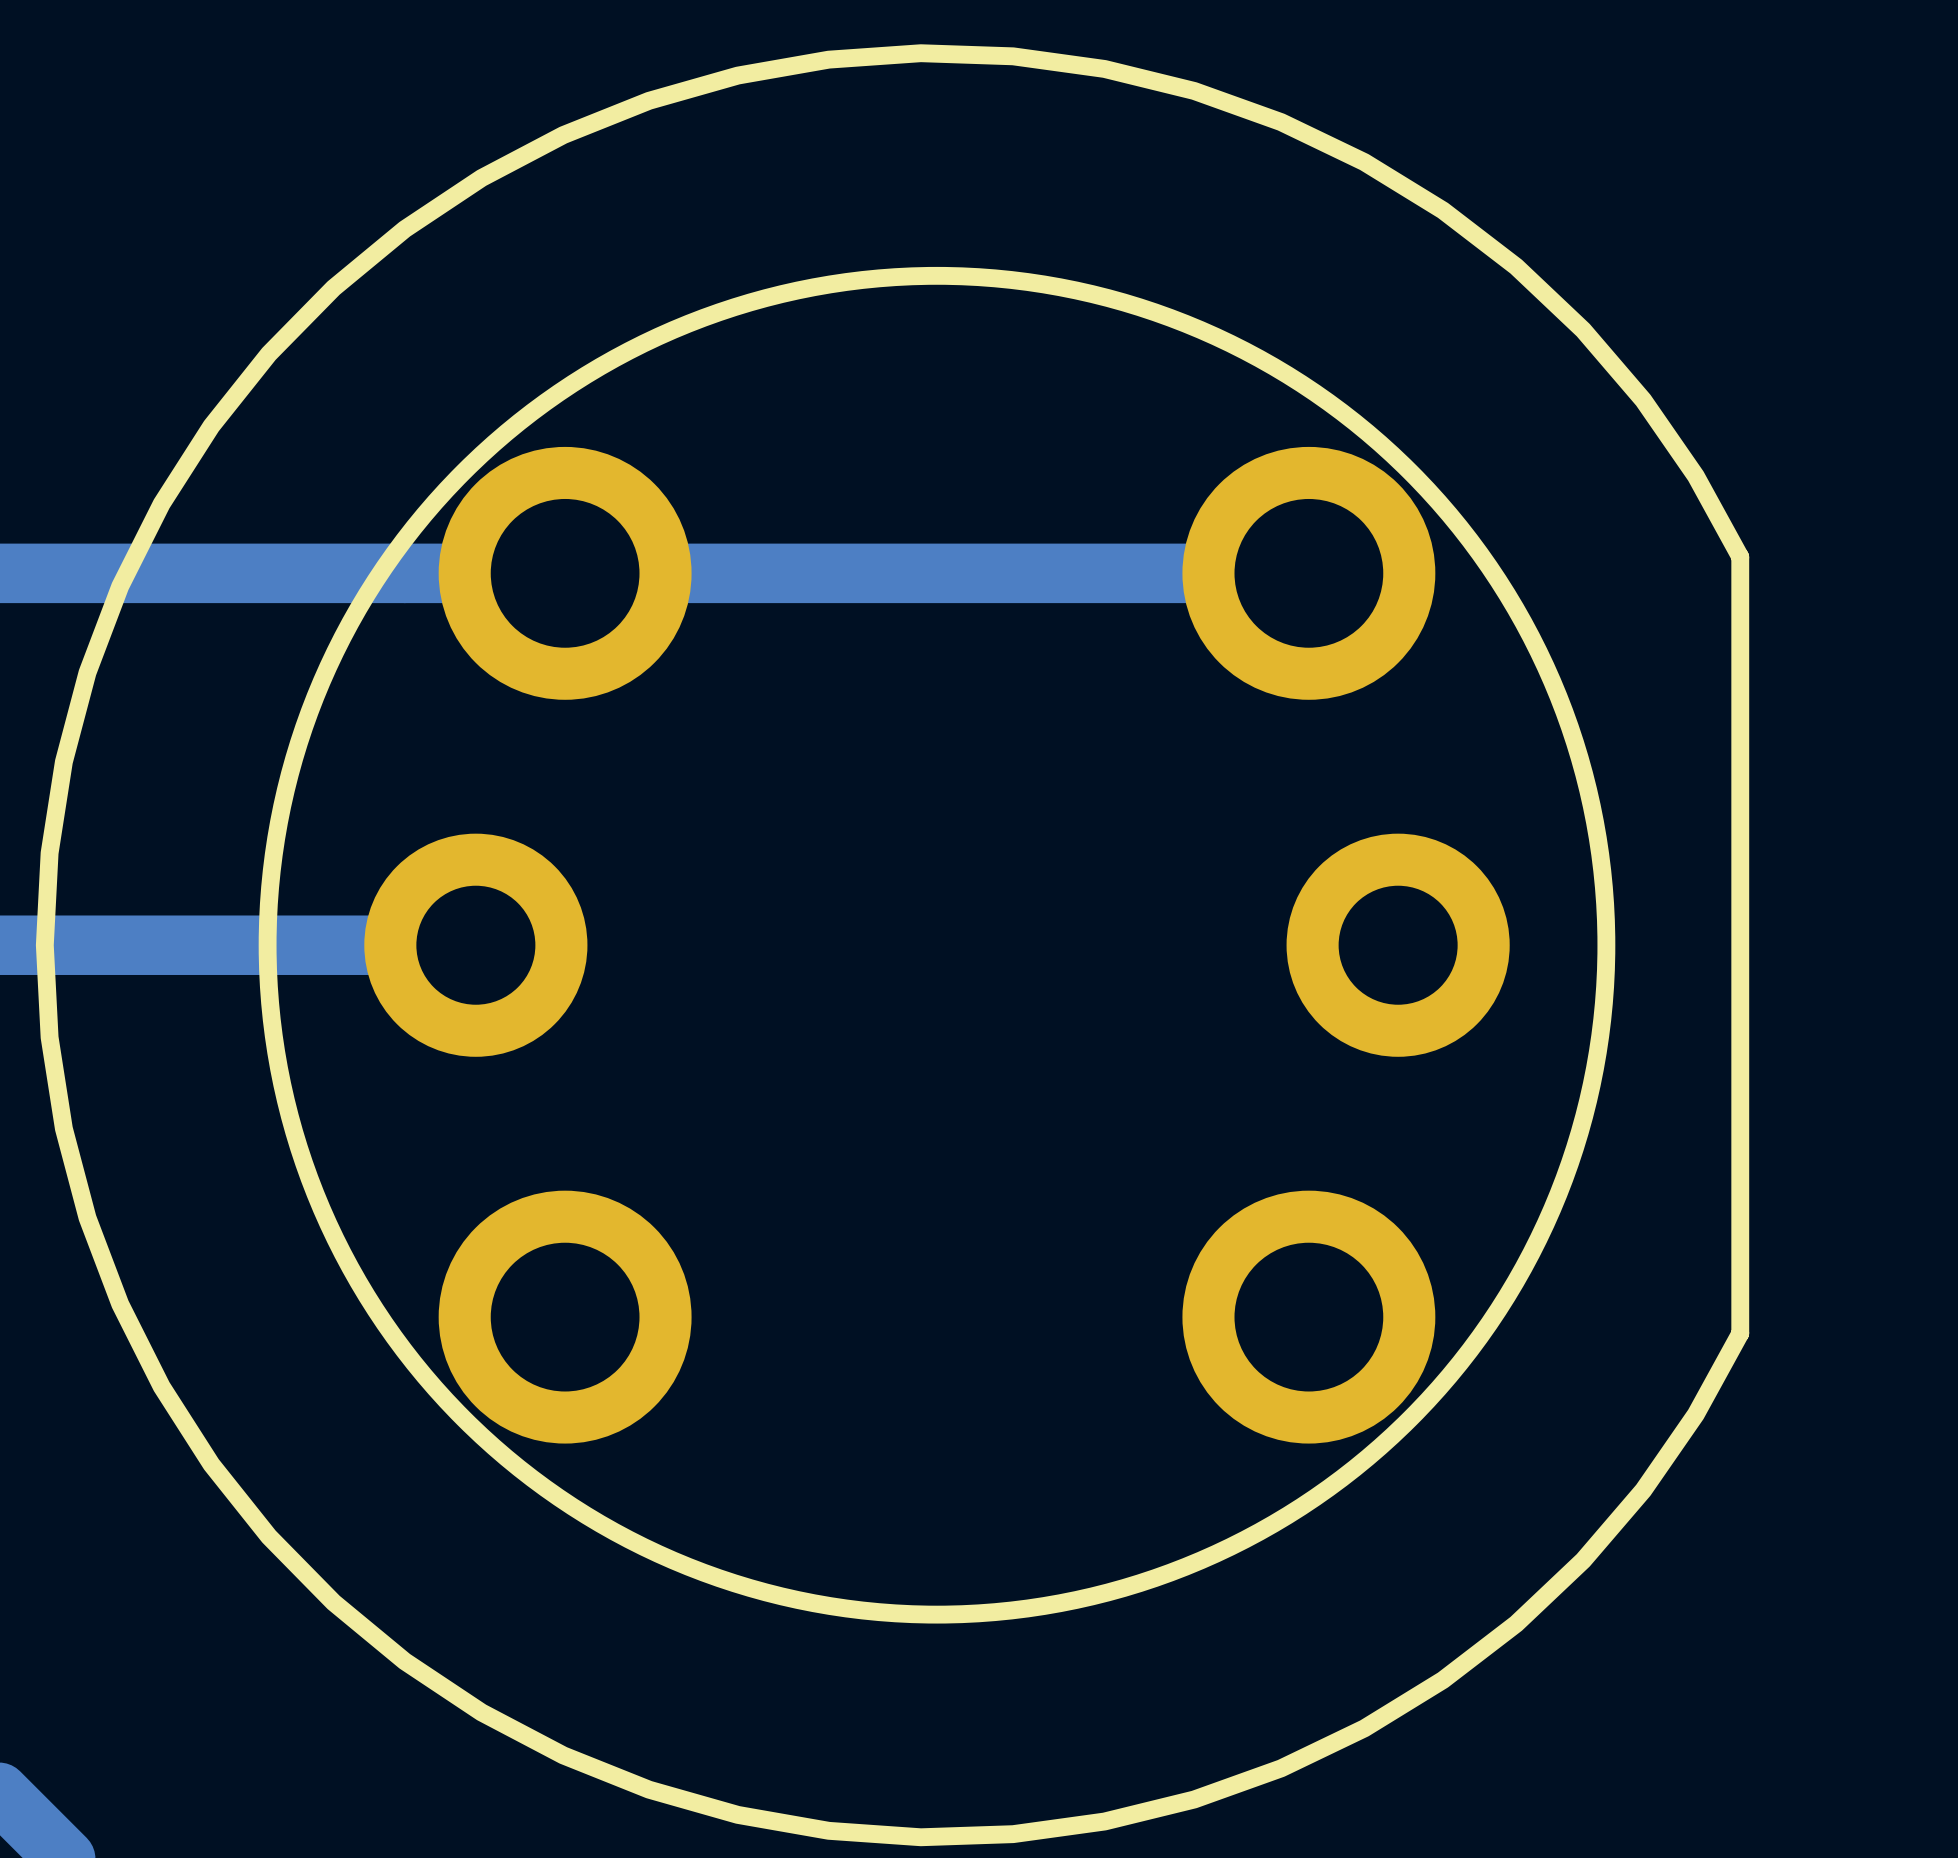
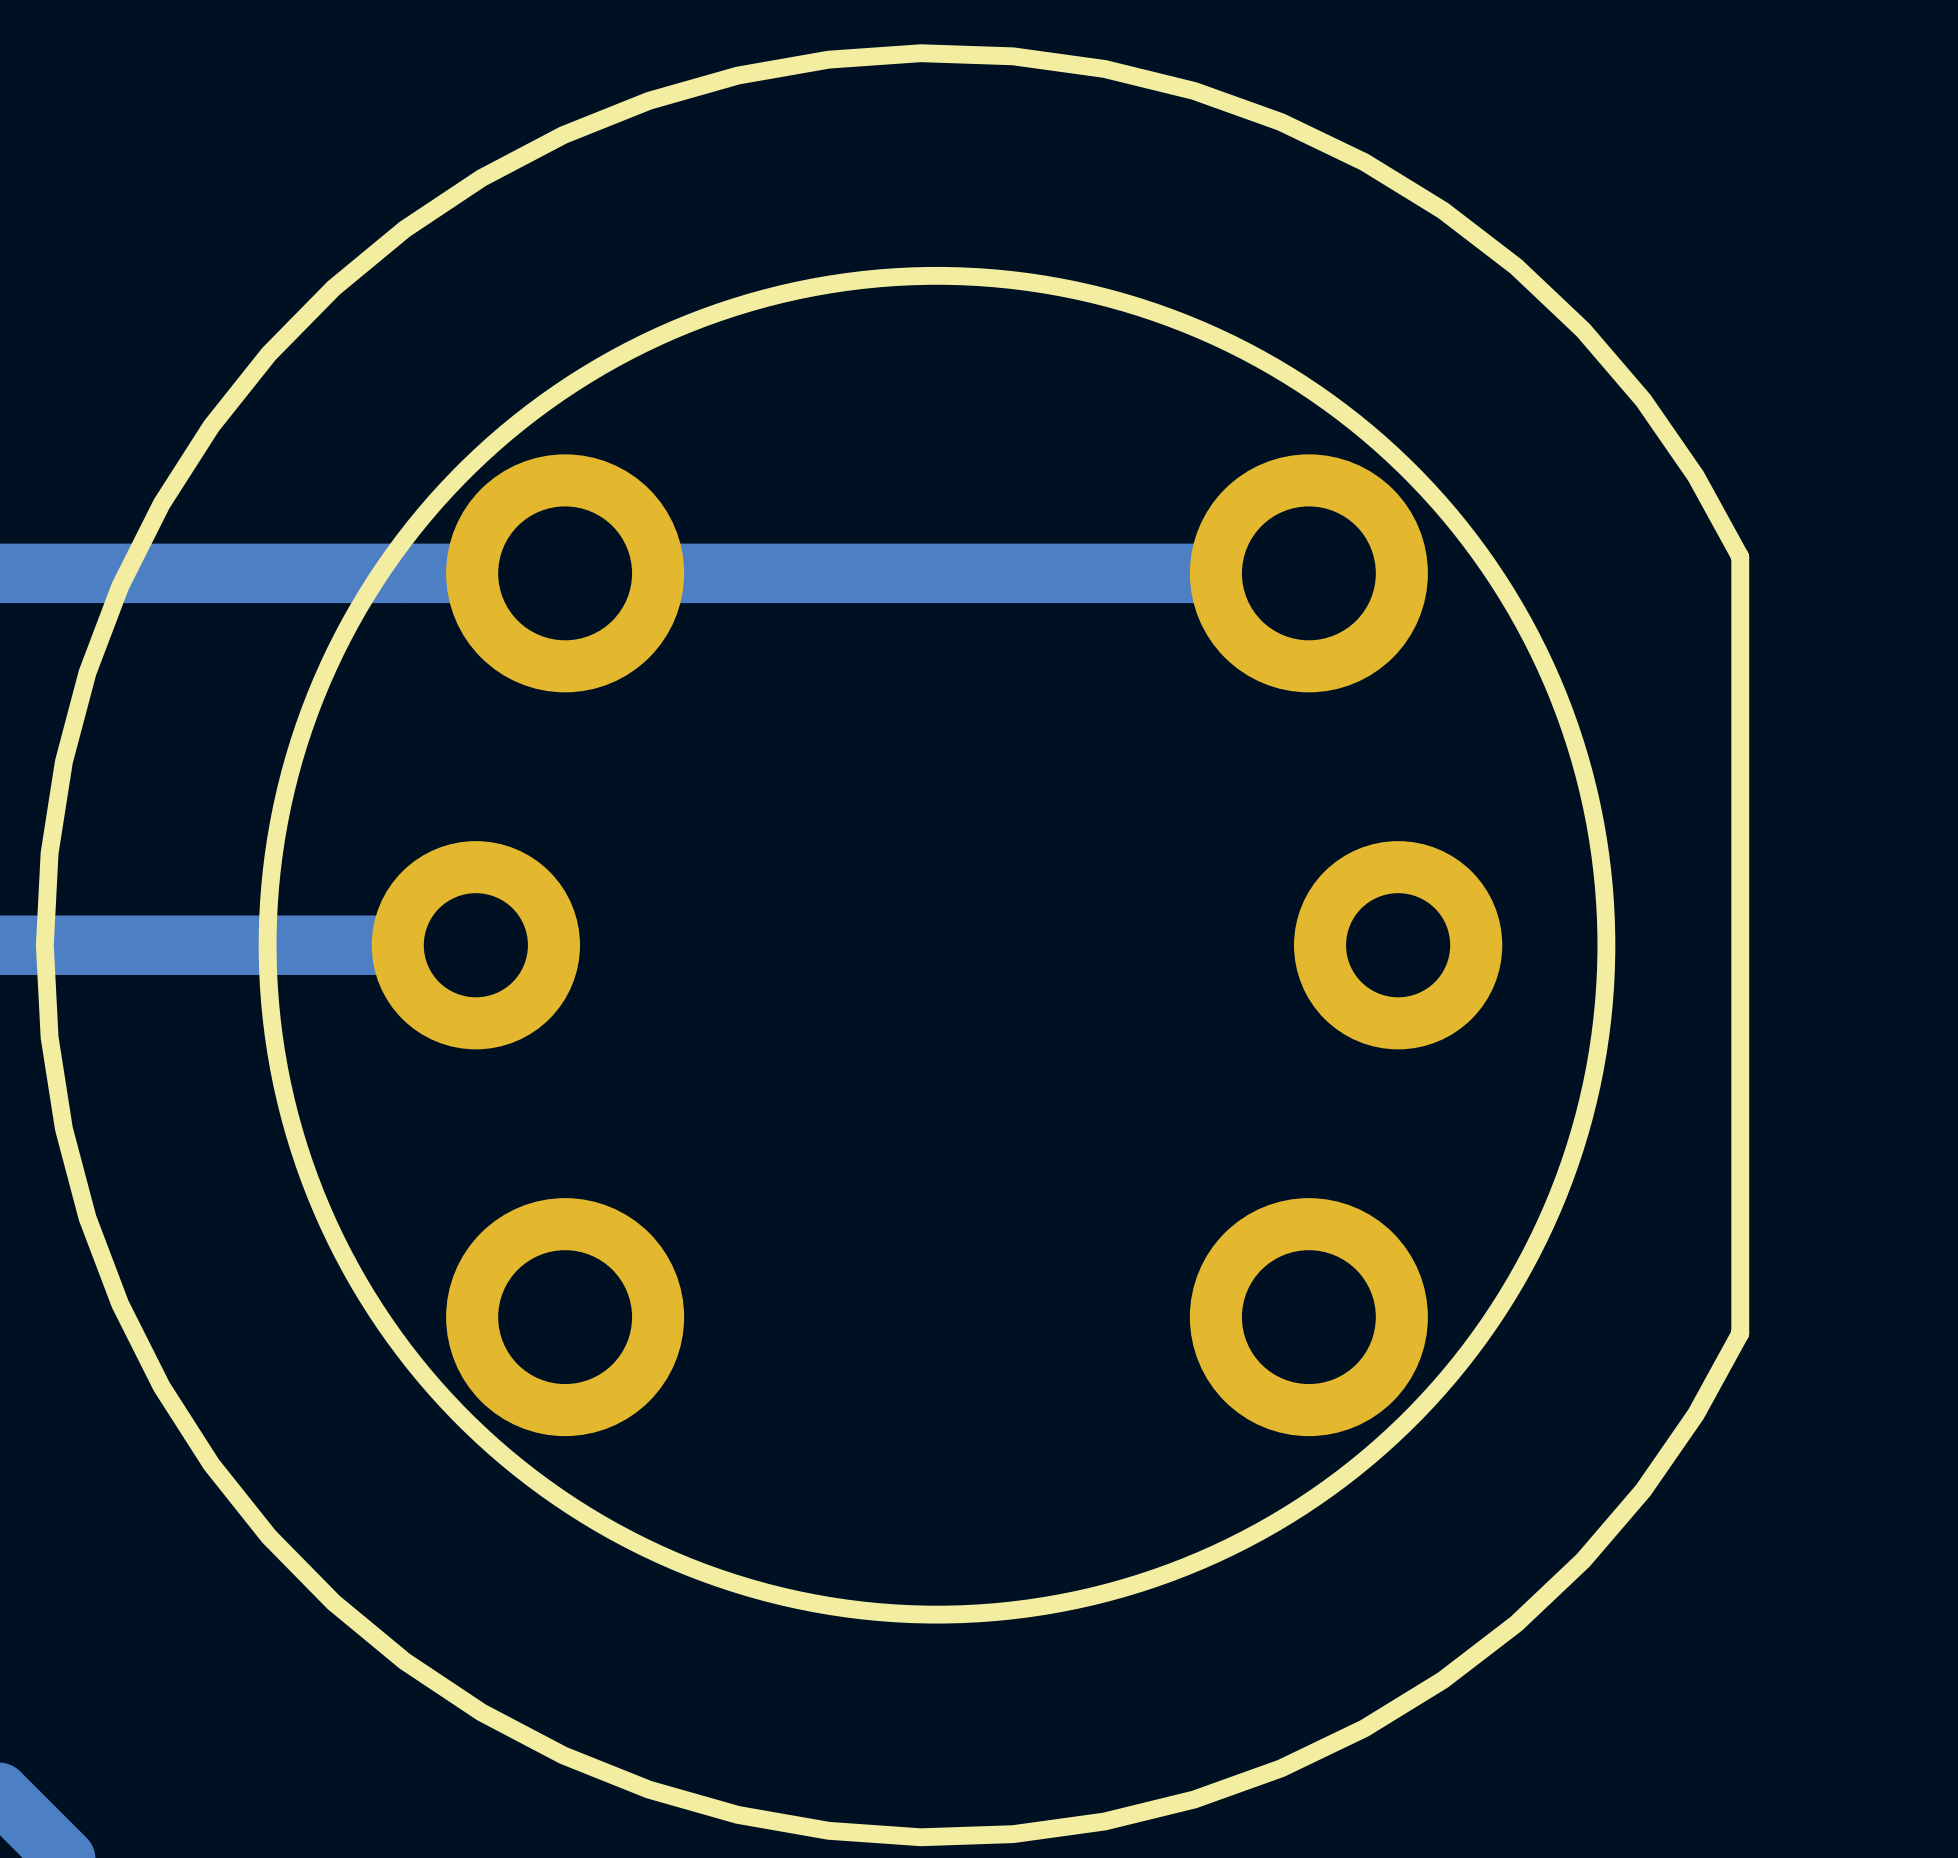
part footprint: [35, 44, 1750, 1847] -> [35, 44, 1750, 1847]

